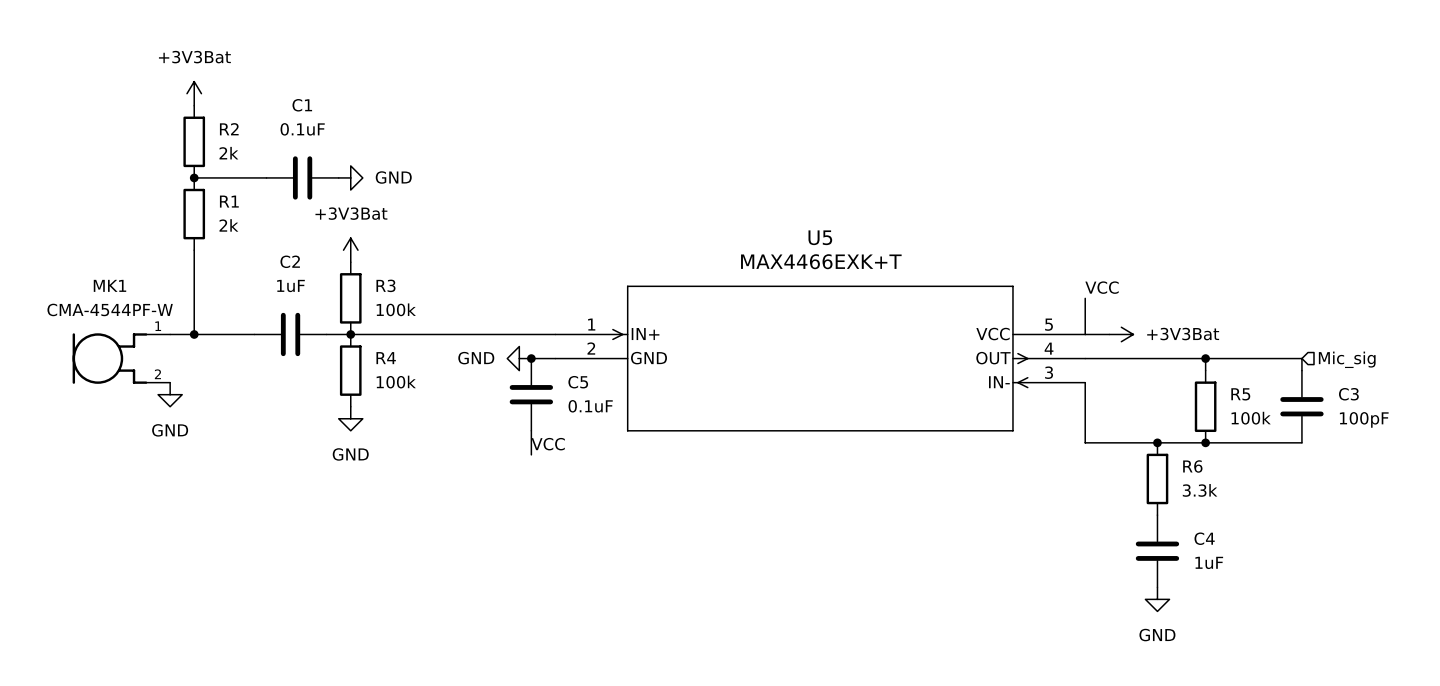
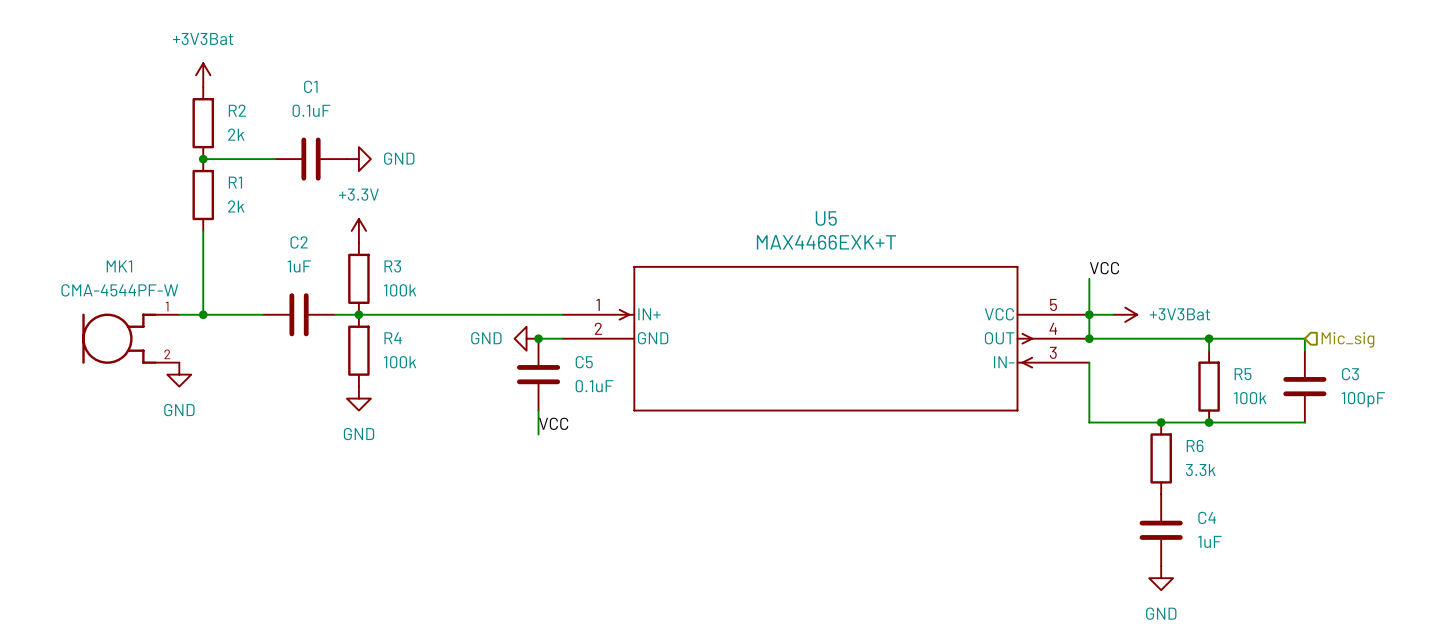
power symbol: +3V3Bat (350, 250) -> +3.3V (358, 230)
wire: none -> (1089, 314) (1089, 338)
junction: none -> (1089, 314)
junction: none -> (1089, 338)

